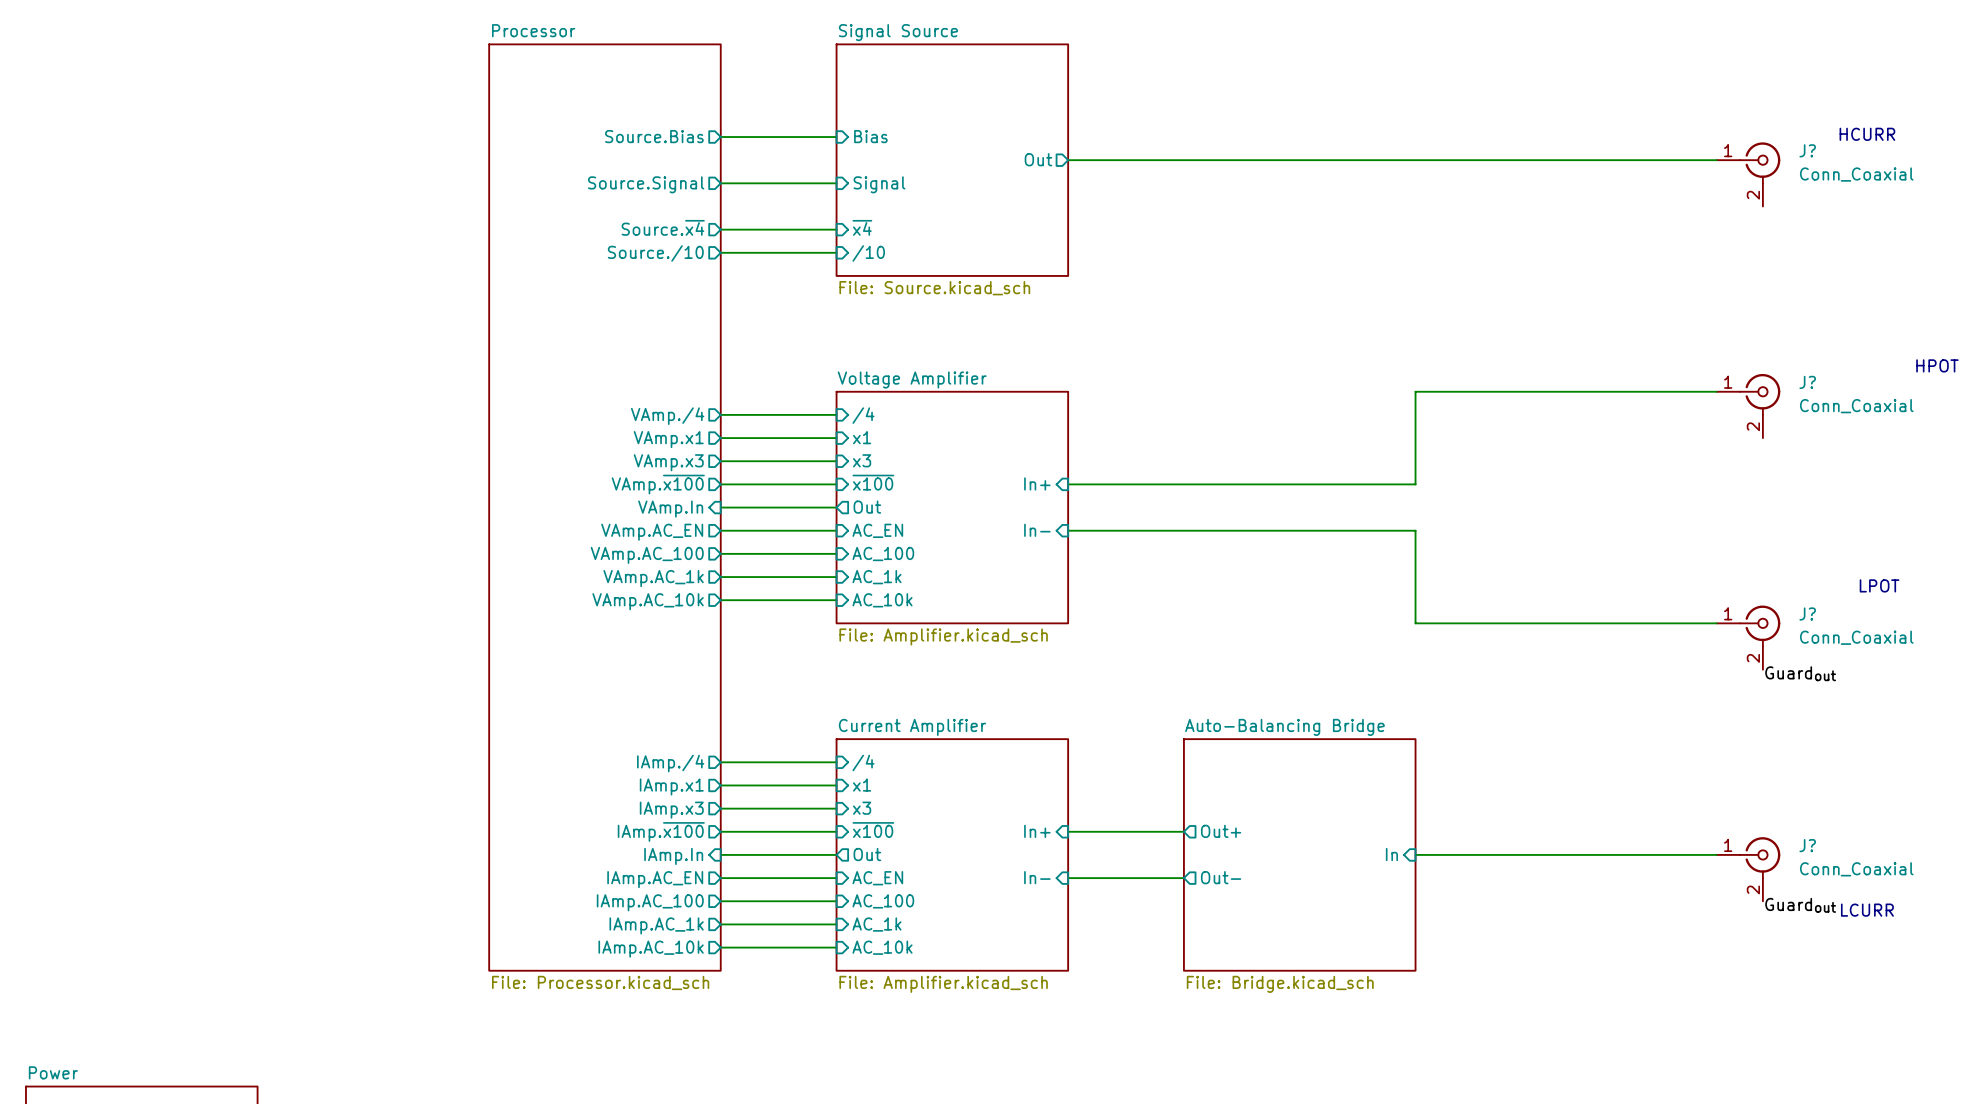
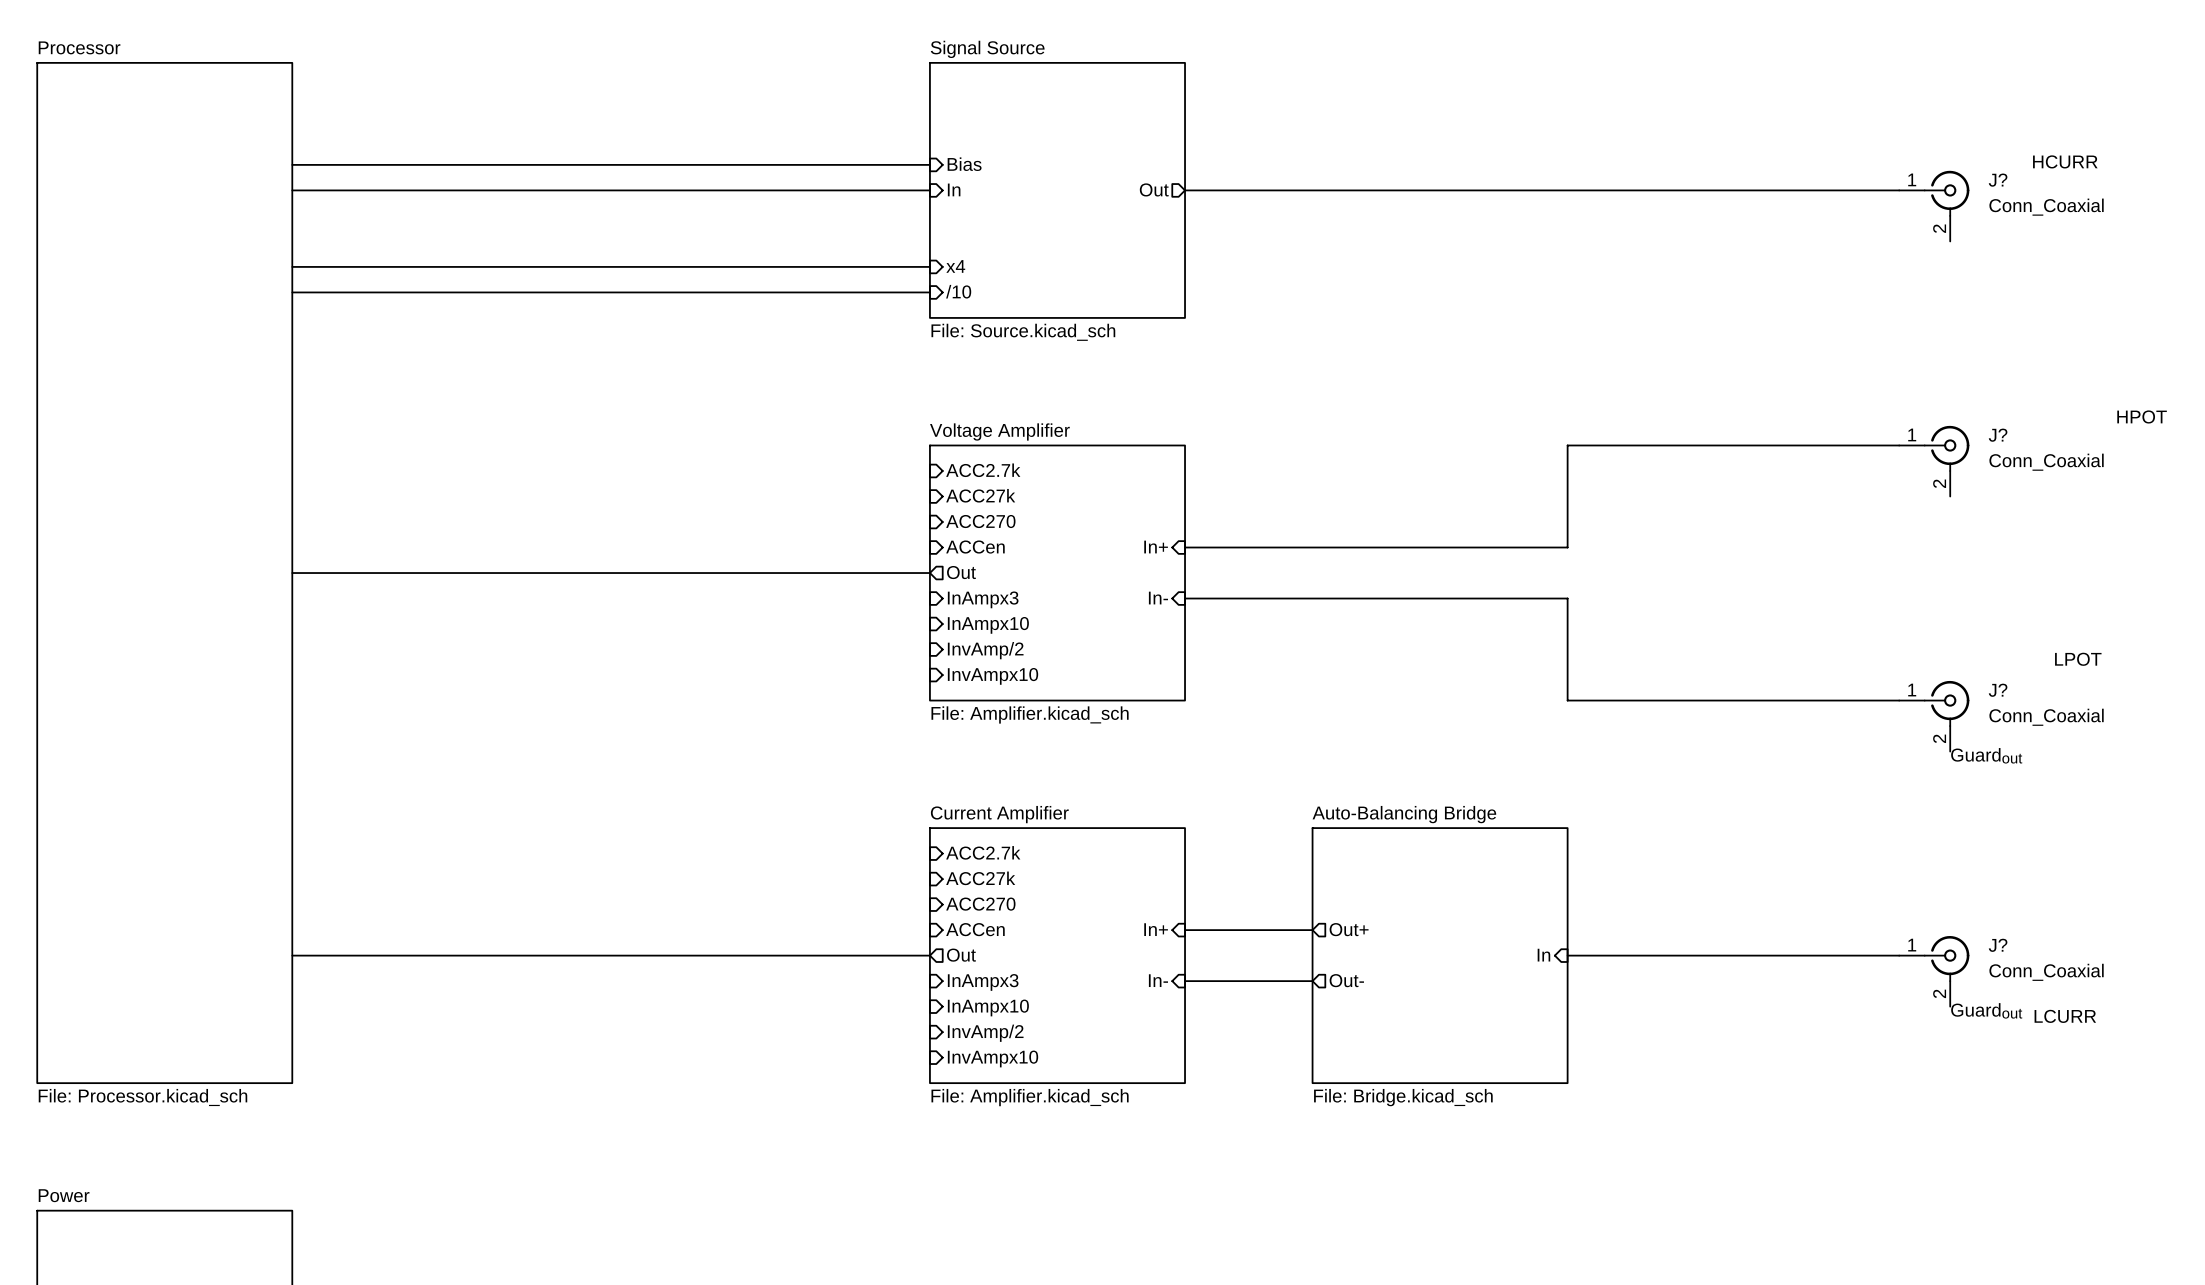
sheet pin: Source.Bias (654, 136) -> none
wire: none -> (292, 164) (802, 164)
sheet pin: none -> In (954, 189)
wire: none -> (292, 190) (929, 190)
wire: (720, 183) (836, 183) -> none
sheet pin: Source.Signal (646, 184) -> none
sheet pin: Signal (879, 184) -> none
sheet pin: Source.~{x4} (663, 227) -> none
sheet pin: ~{x4} (862, 227) -> x4 (955, 266)
wire: none -> (292, 266) (802, 266)
wire: none -> (292, 292) (802, 292)
sheet pin: Source./10 (655, 253) -> none
wire: (720, 414) (836, 414) -> none
sheet pin: /4 (863, 415) -> ACC2.7k (983, 470)
sheet pin: VAmp./4 (667, 416) -> none
sheet pin: x1 (862, 437) -> ACC27k (980, 495)
wire: (720, 438) (836, 438) -> none
sheet pin: VAmp.x1 (668, 439) -> none
sheet pin: x3 (862, 460) -> ACC270 (980, 521)
wire: (720, 461) (836, 461) -> none
sheet pin: VAmp.x3 (668, 462) -> none
sheet pin: ~{x100} (873, 482) -> ACCen (975, 547)
sheet pin: VAmp.~{x100} (658, 484) -> none
wire: (720, 484) (836, 484) -> none
sheet Processor: none -> File: Processor.kicad_sch (164, 573)
wire: none -> (292, 573) (802, 573)
sheet Processor: File: Processor.kicad_sch (604, 507) -> none
sheet pin: VAmp.In (670, 509) -> none
wire: (720, 530) (836, 530) -> none
sheet pin: AC_EN (877, 530) -> InAmpx3 (983, 599)
sheet pin: VAmp.AC_EN (652, 532) -> none
wire: (720, 553) (836, 553) -> none
sheet pin: AC_100 (883, 553) -> InAmpx10 (988, 625)
sheet pin: VAmp.AC_100 (647, 555) -> none
wire: (720, 577) (836, 577) -> none
sheet pin: AC_1k (876, 577) -> InvAmp/2 (985, 650)
sheet pin: VAmp.AC_1k (653, 578) -> none
wire: (720, 600) (836, 600) -> none
sheet pin: AC_10k (882, 600) -> InvAmpx10 (993, 676)
sheet pin: VAmp.AC_10k (648, 601) -> none
wire: (720, 762) (836, 762) -> none
sheet pin: /4 (863, 762) -> ACC2.7k (983, 852)
sheet pin: IAmp./4 (670, 763) -> none
wire: (720, 785) (836, 785) -> none
sheet pin: x1 (862, 785) -> ACC27k (980, 878)
sheet pin: IAmp.x1 (671, 786) -> none
wire: (720, 808) (836, 808) -> none
sheet pin: x3 (862, 808) -> ACC270 (980, 904)
sheet pin: IAmp.x3 (671, 810) -> none
sheet pin: ~{x100} (873, 830) -> ACCen (975, 929)
sheet pin: IAmp.~{x100} (661, 831) -> none
wire: (720, 831) (836, 831) -> none
wire: none -> (292, 955) (802, 955)
sheet pin: IAmp.In (673, 856) -> none
wire: (720, 878) (836, 878) -> none
sheet pin: AC_EN (877, 878) -> InAmpx3 (983, 982)
sheet pin: IAmp.AC_EN (655, 879) -> none
wire: (720, 901) (836, 901) -> none
sheet pin: AC_100 (883, 901) -> InAmpx10 (988, 1007)
sheet pin: IAmp.AC_100 (650, 902) -> none
wire: (720, 924) (836, 924) -> none
sheet pin: AC_1k (876, 924) -> InvAmp/2 (985, 1033)
sheet pin: IAmp.AC_1k (656, 925) -> none
wire: (720, 947) (836, 947) -> none
sheet pin: AC_10k (882, 947) -> InvAmpx10 (993, 1058)
sheet pin: IAmp.AC_10k (651, 949) -> none

